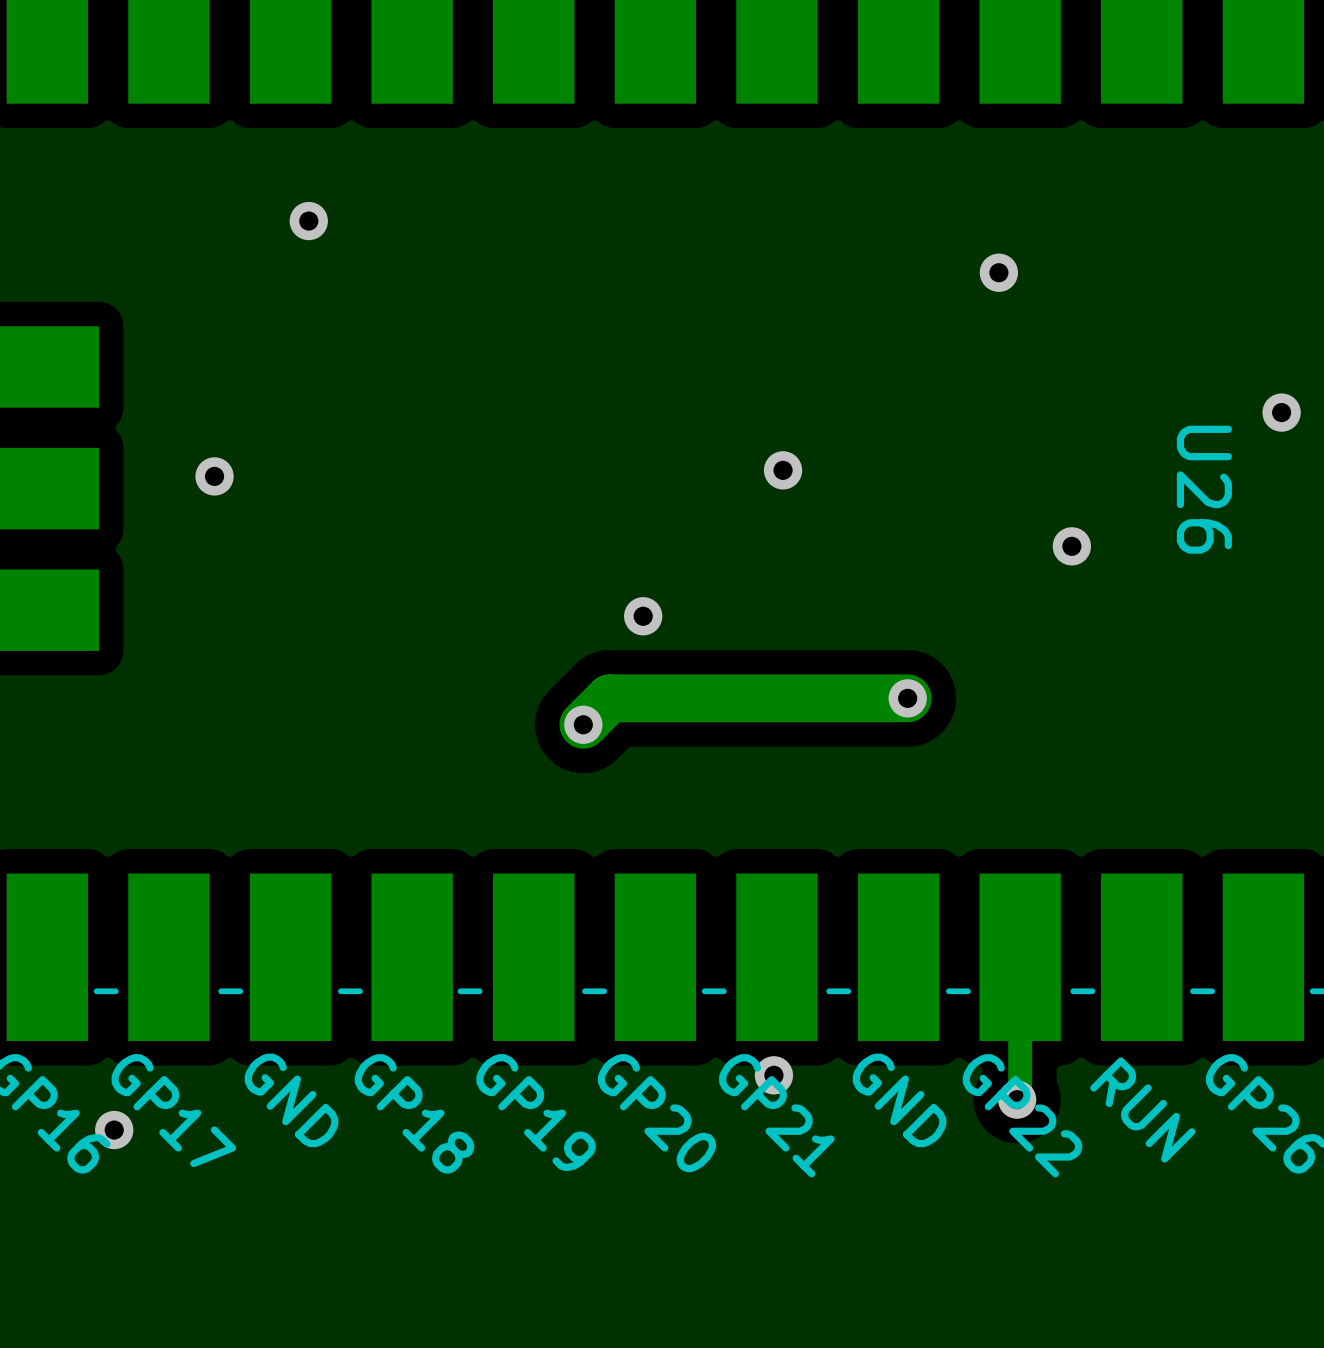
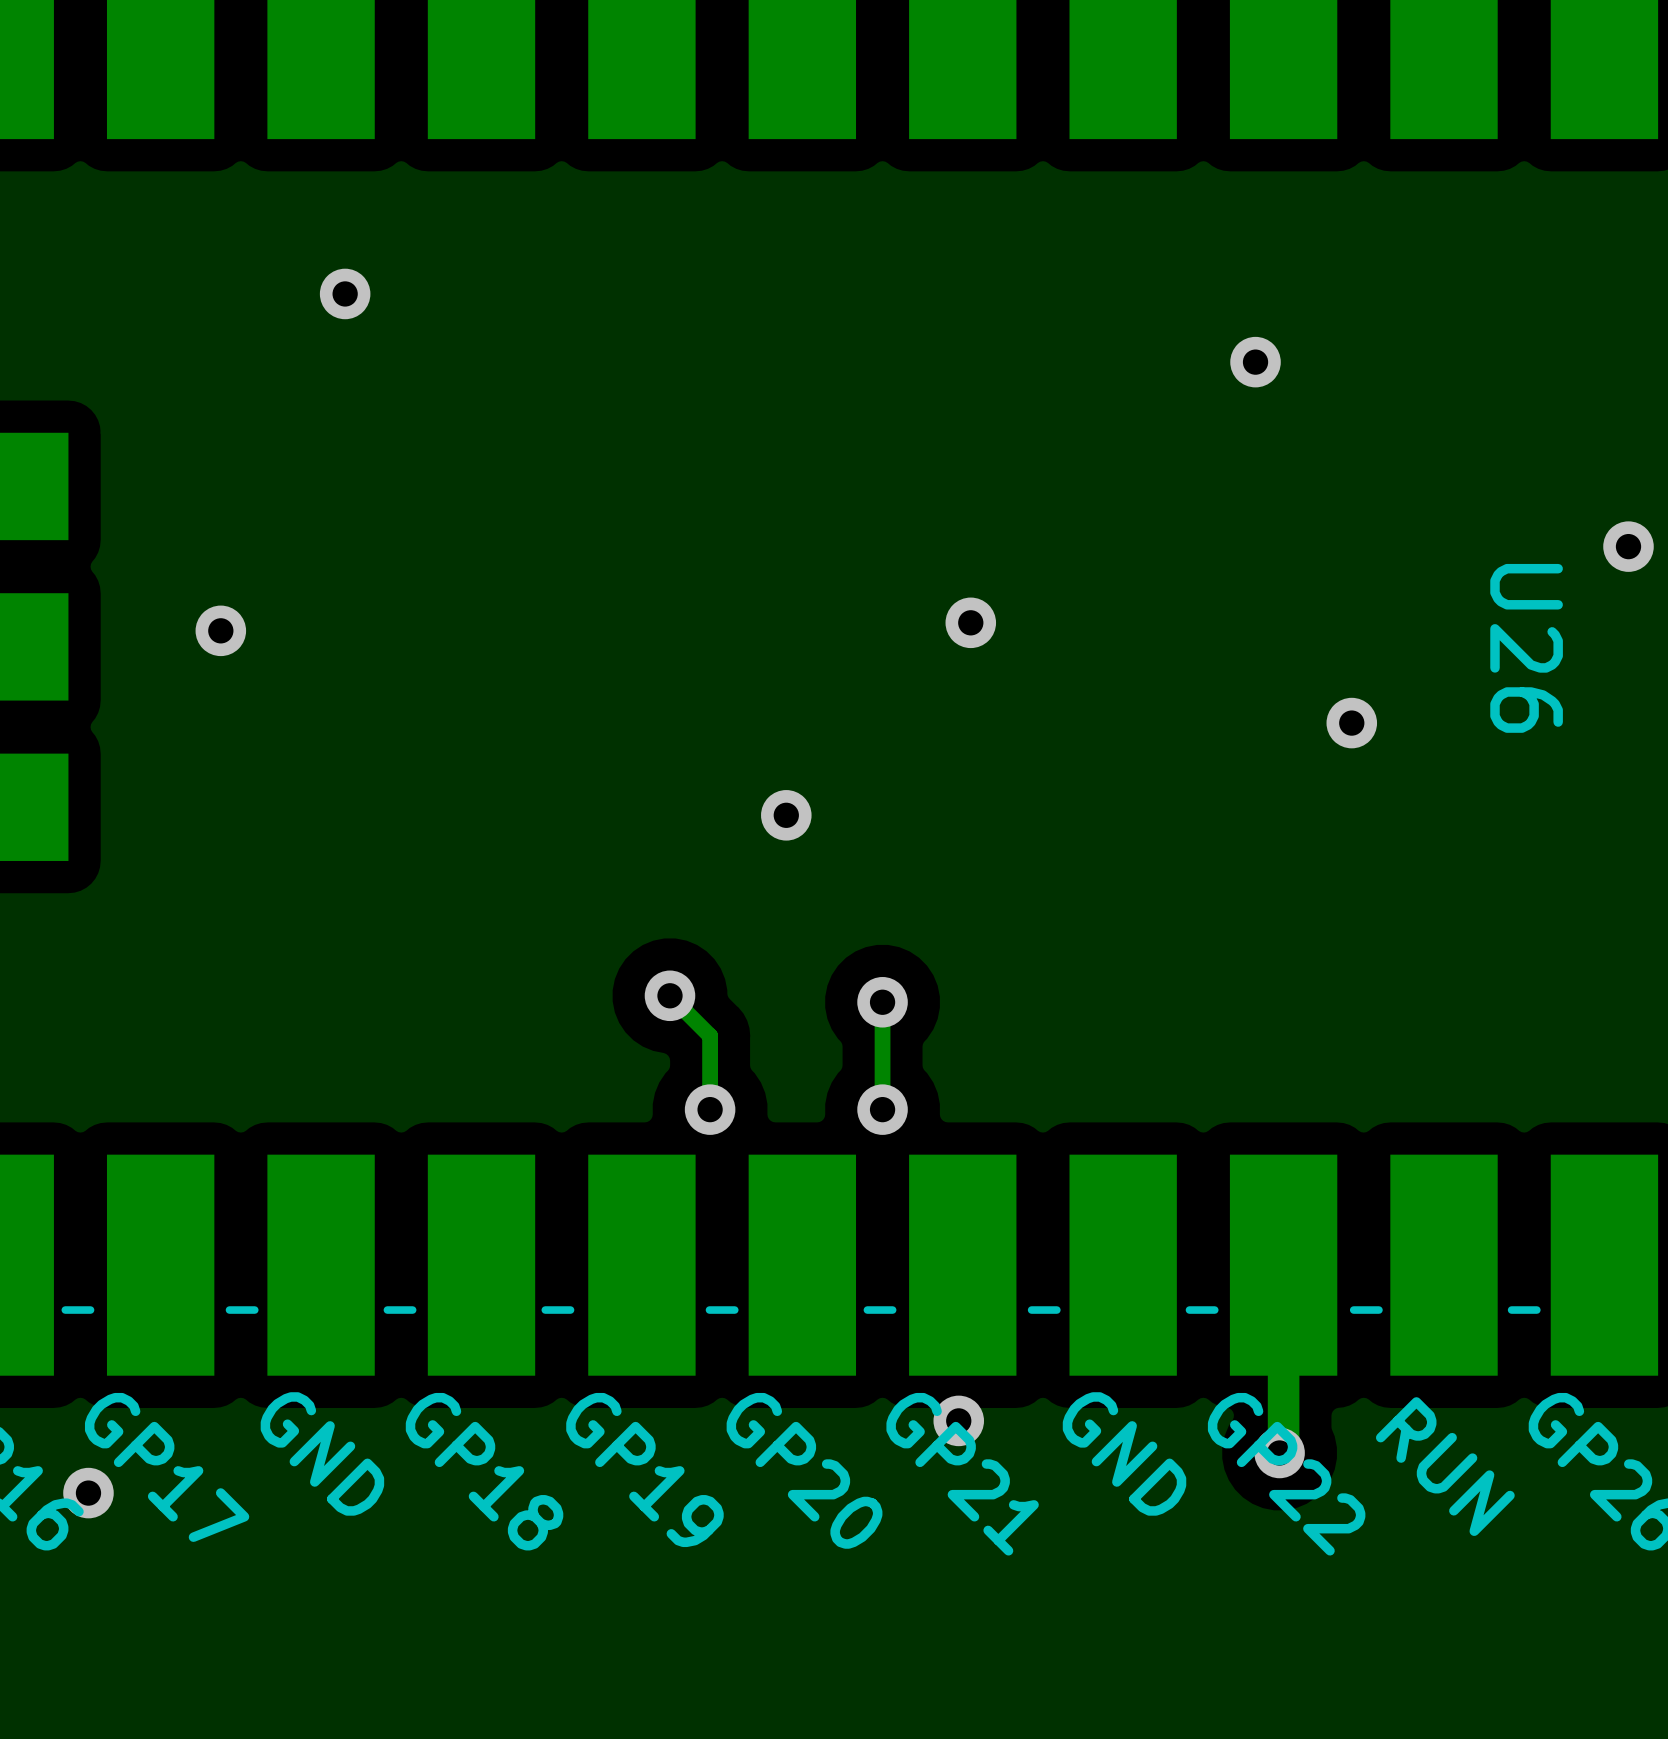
track: (907, 698) (609, 698) (583, 724) -> none
via: (907, 698) -> none
via position: (583, 724) -> (669, 995)
track: none -> (669, 995) (710, 1035) (710, 1109)
track: none -> (882, 1002) (882, 1109)
via: none -> (882, 1002)
via: none -> (710, 1109)
via: none -> (882, 1109)

